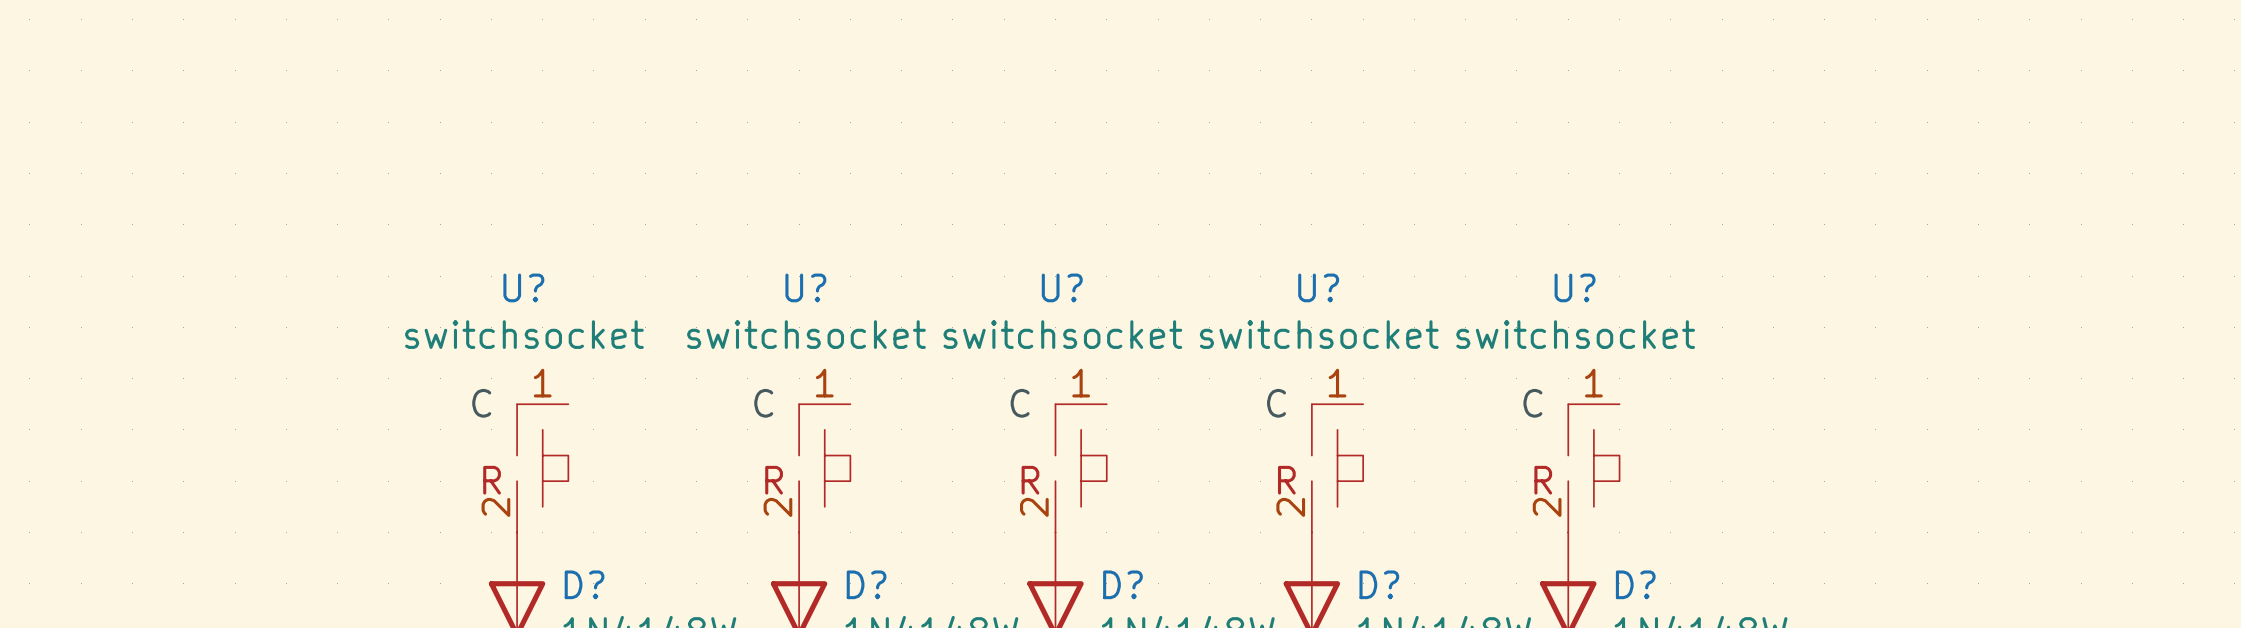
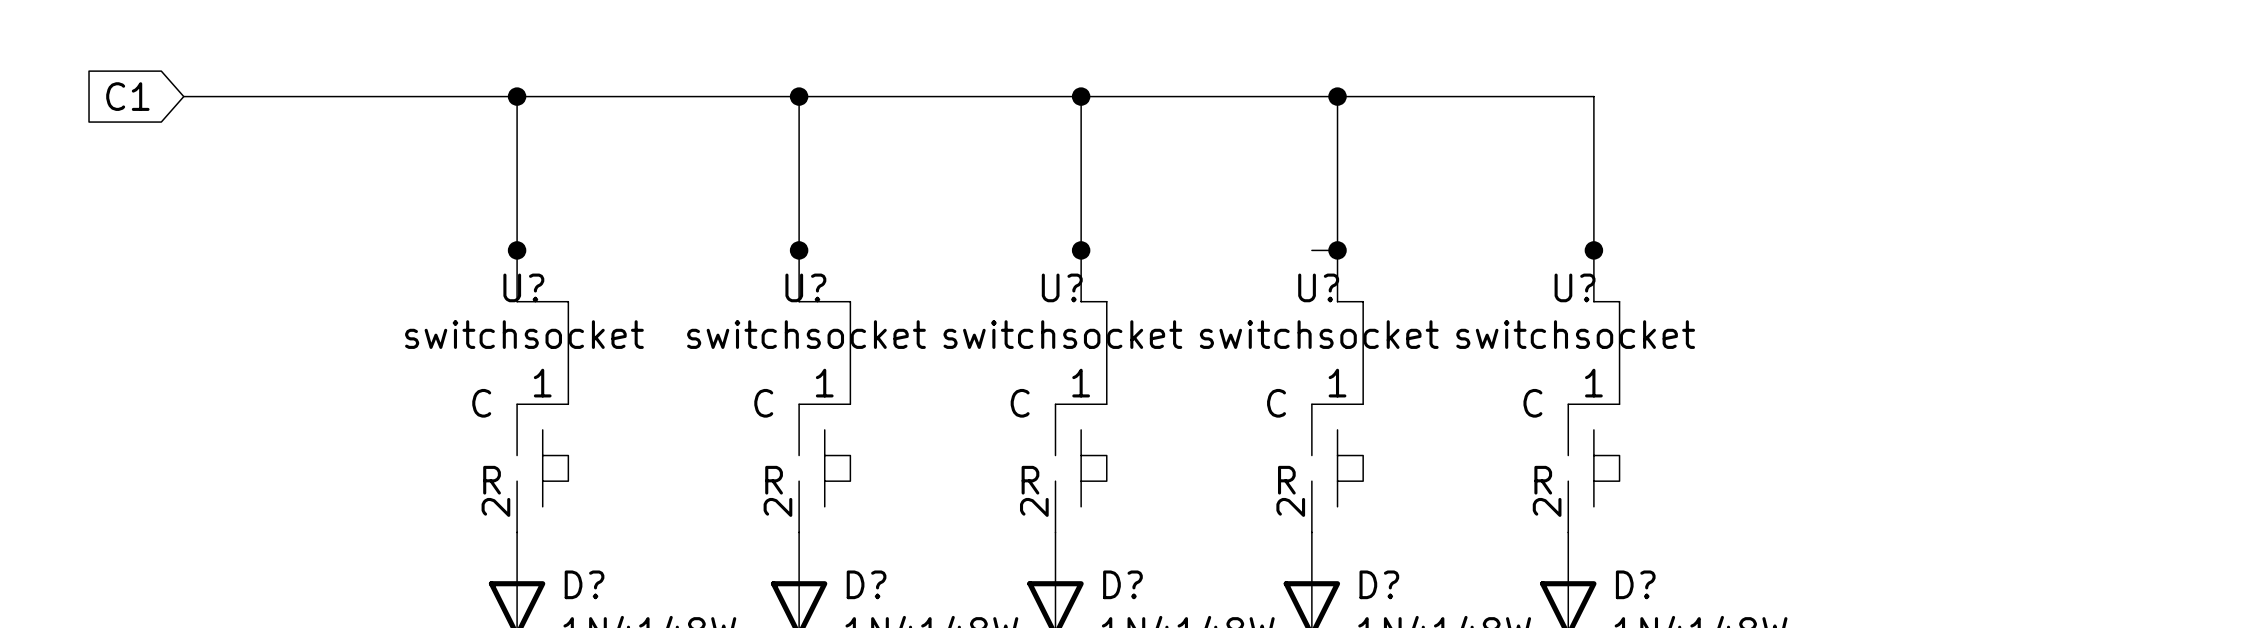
global label: none -> C1 (127, 96)
wire: none -> (183, 96) (1593, 96) (1593, 301) (1619, 301) (1619, 404)
wire: none -> (517, 96) (517, 301) (568, 301) (568, 404)
junction: none -> (517, 96)
wire: none -> (799, 96) (799, 301) (850, 301) (850, 404)
junction: none -> (799, 96)
wire: none -> (1081, 96) (1081, 301) (1106, 301) (1106, 404)
junction: none -> (1081, 96)
wire: none -> (1337, 96) (1337, 301) (1363, 301) (1363, 404)
junction: none -> (1337, 96)
junction: none -> (517, 250)
junction: none -> (799, 250)
junction: none -> (1081, 250)
wire: none -> (1311, 250) (1337, 250)
junction: none -> (1337, 250)
junction: none -> (1593, 250)

